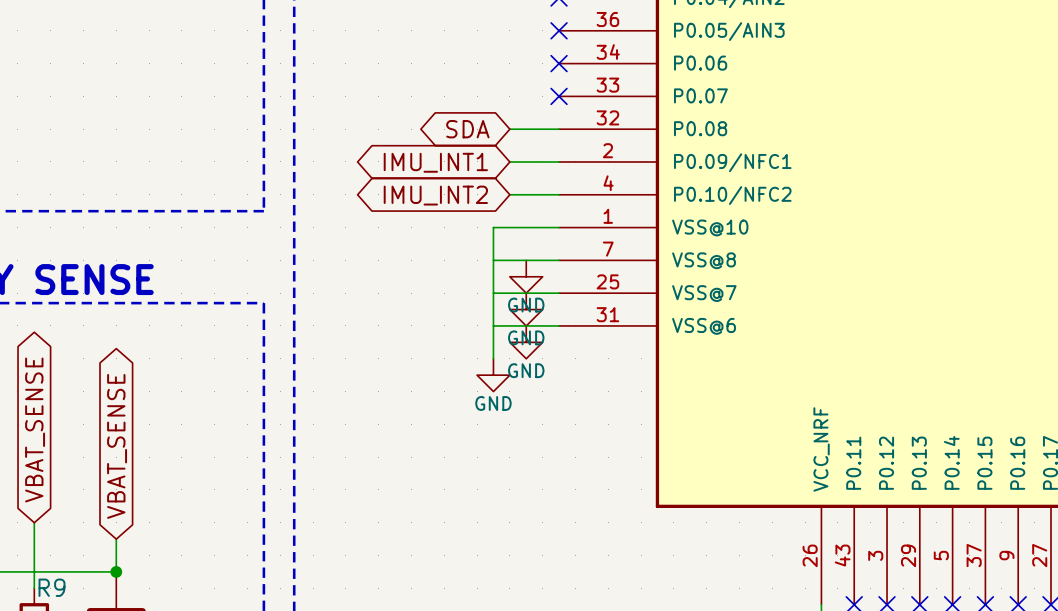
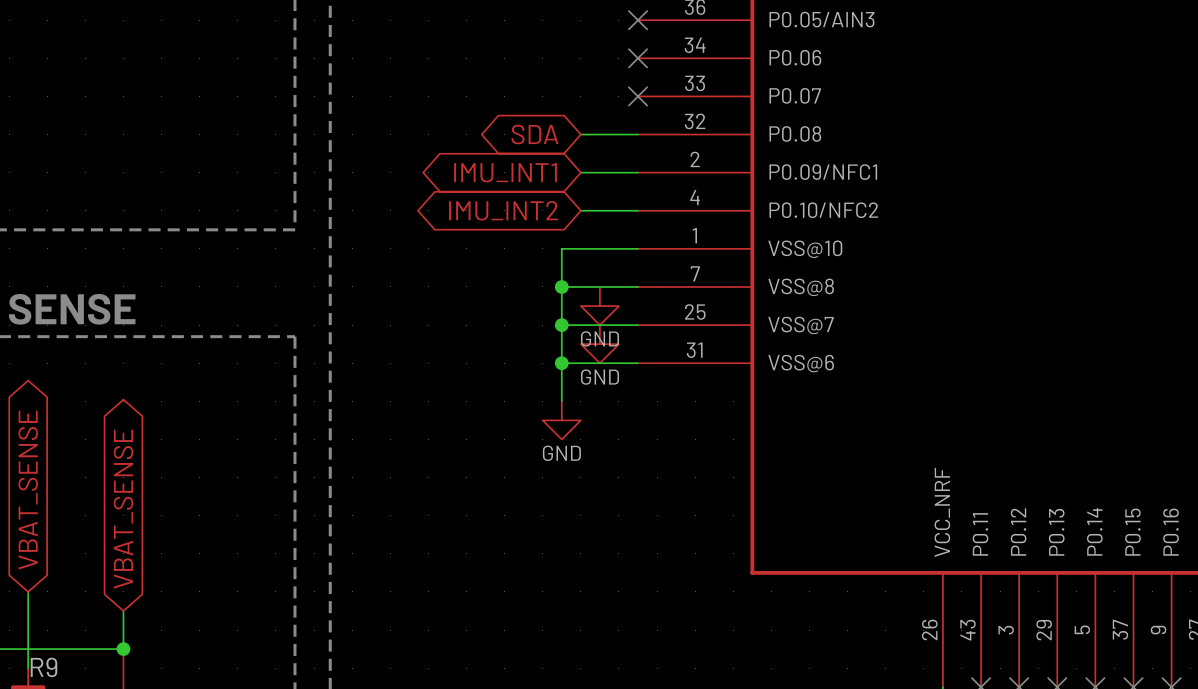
junction: none -> (561, 286)
junction: none -> (561, 325)
junction: none -> (561, 363)
power symbol: GND (526, 342) -> none

